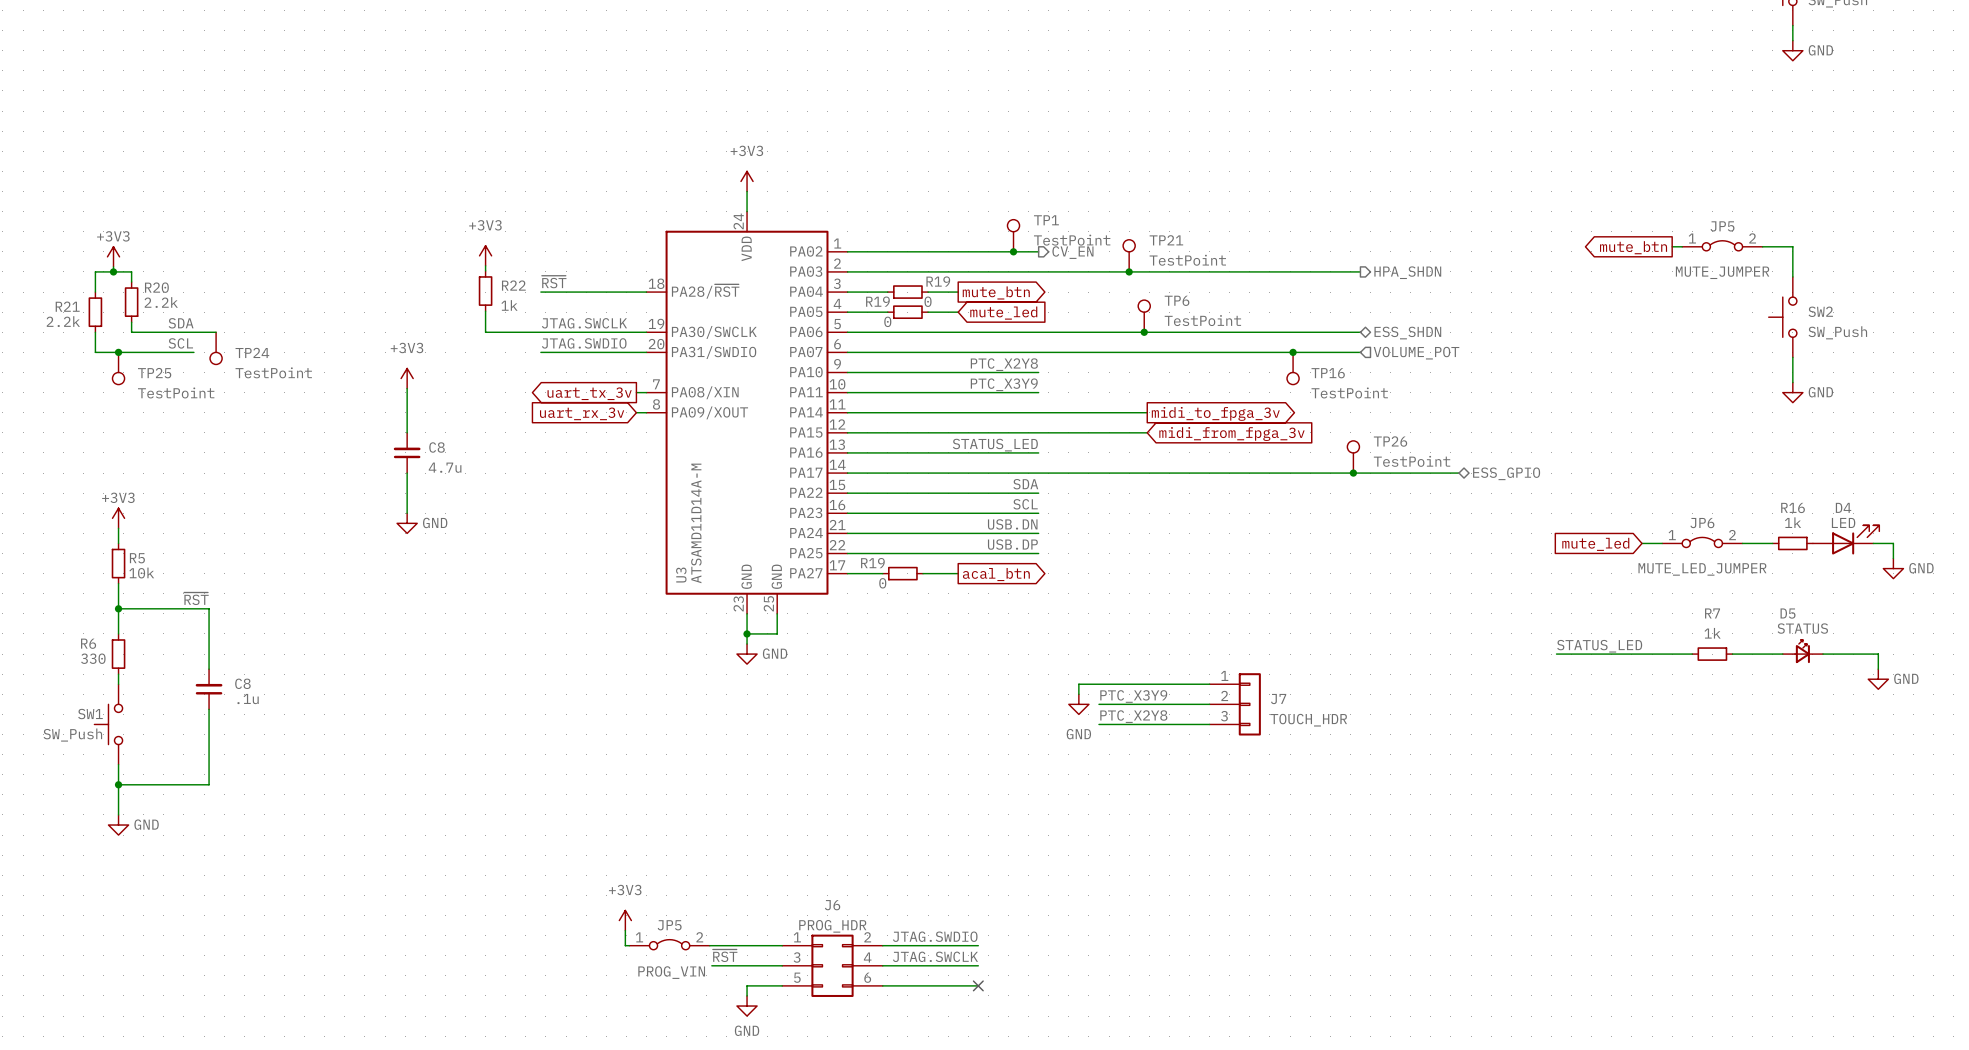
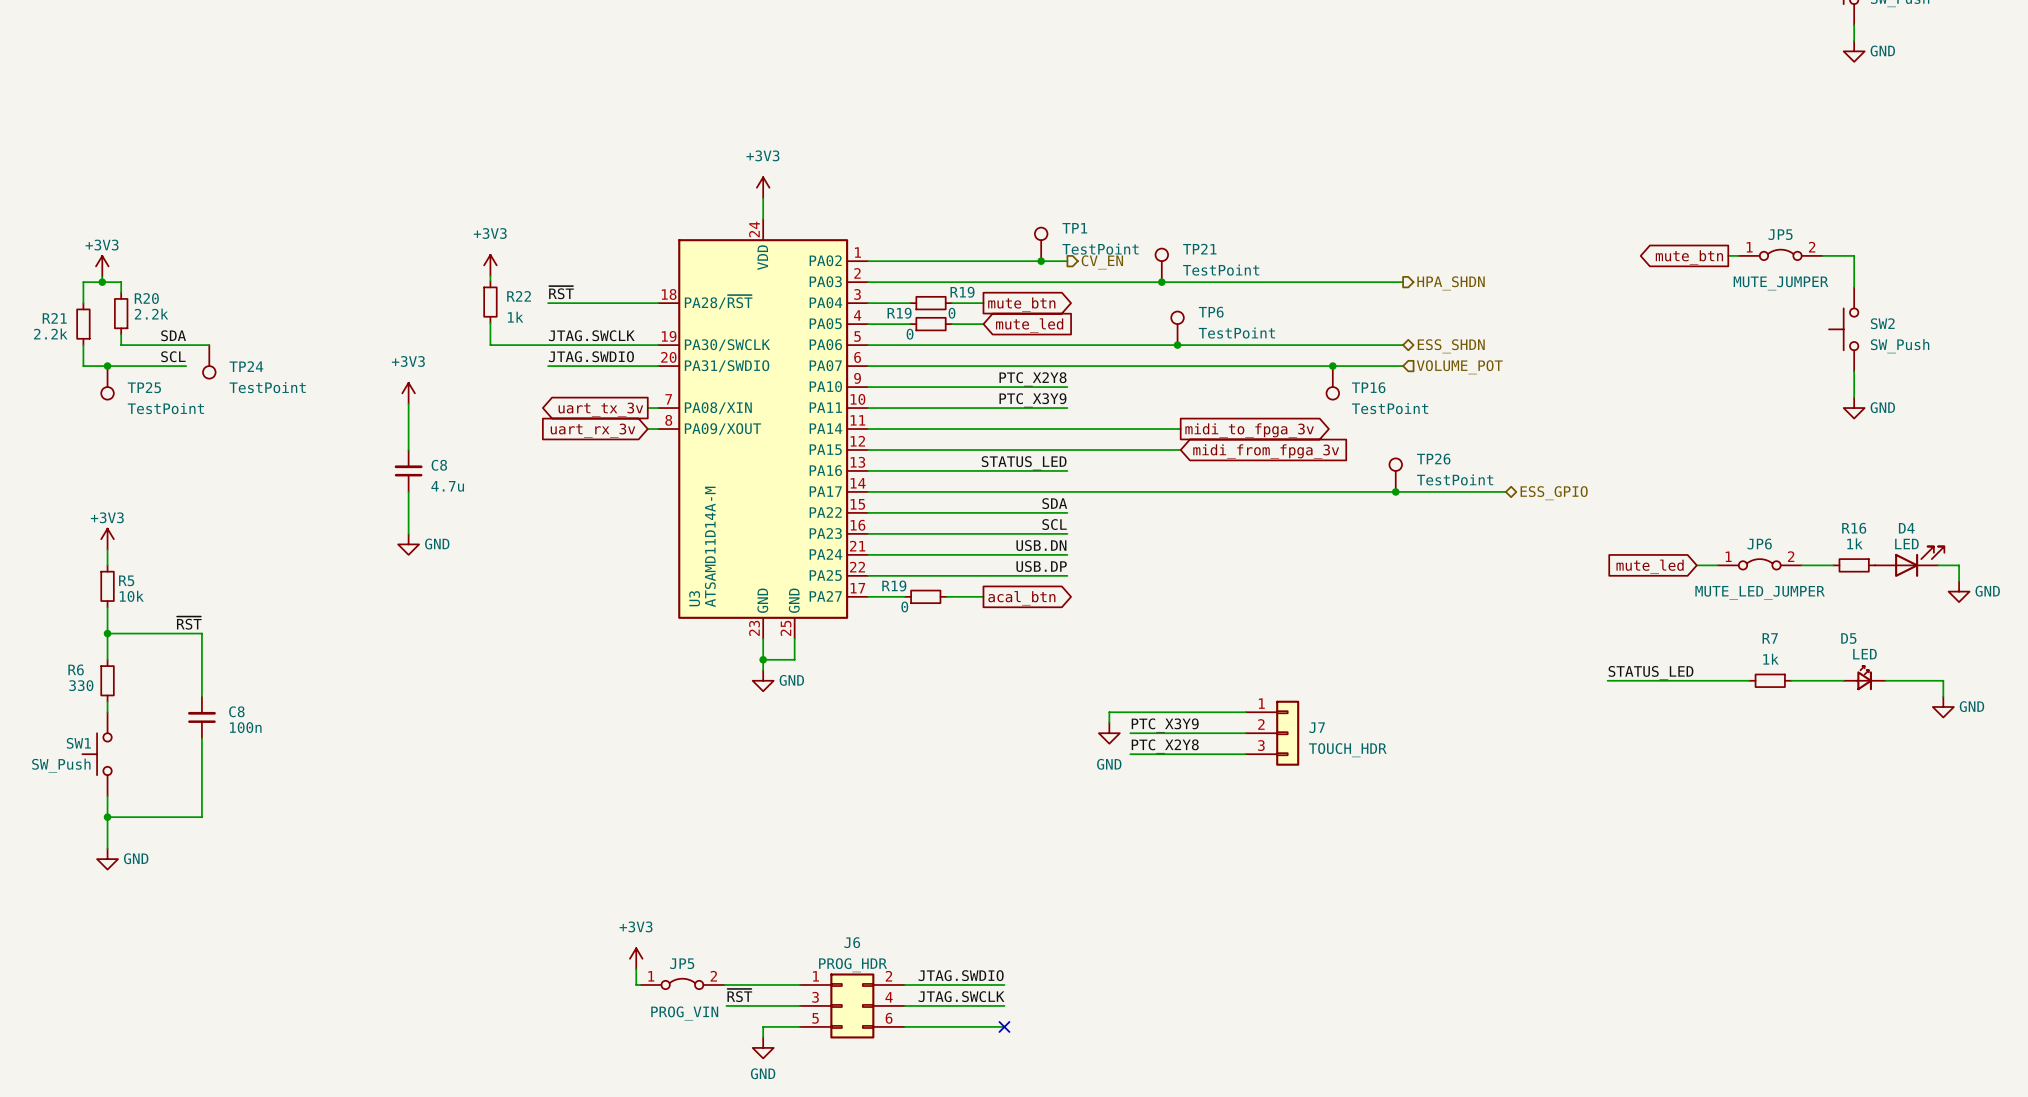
D5 value: STATUS (1802, 628) -> LED (1864, 654)
C8 value: .1u (248, 699) -> 100n (245, 727)

